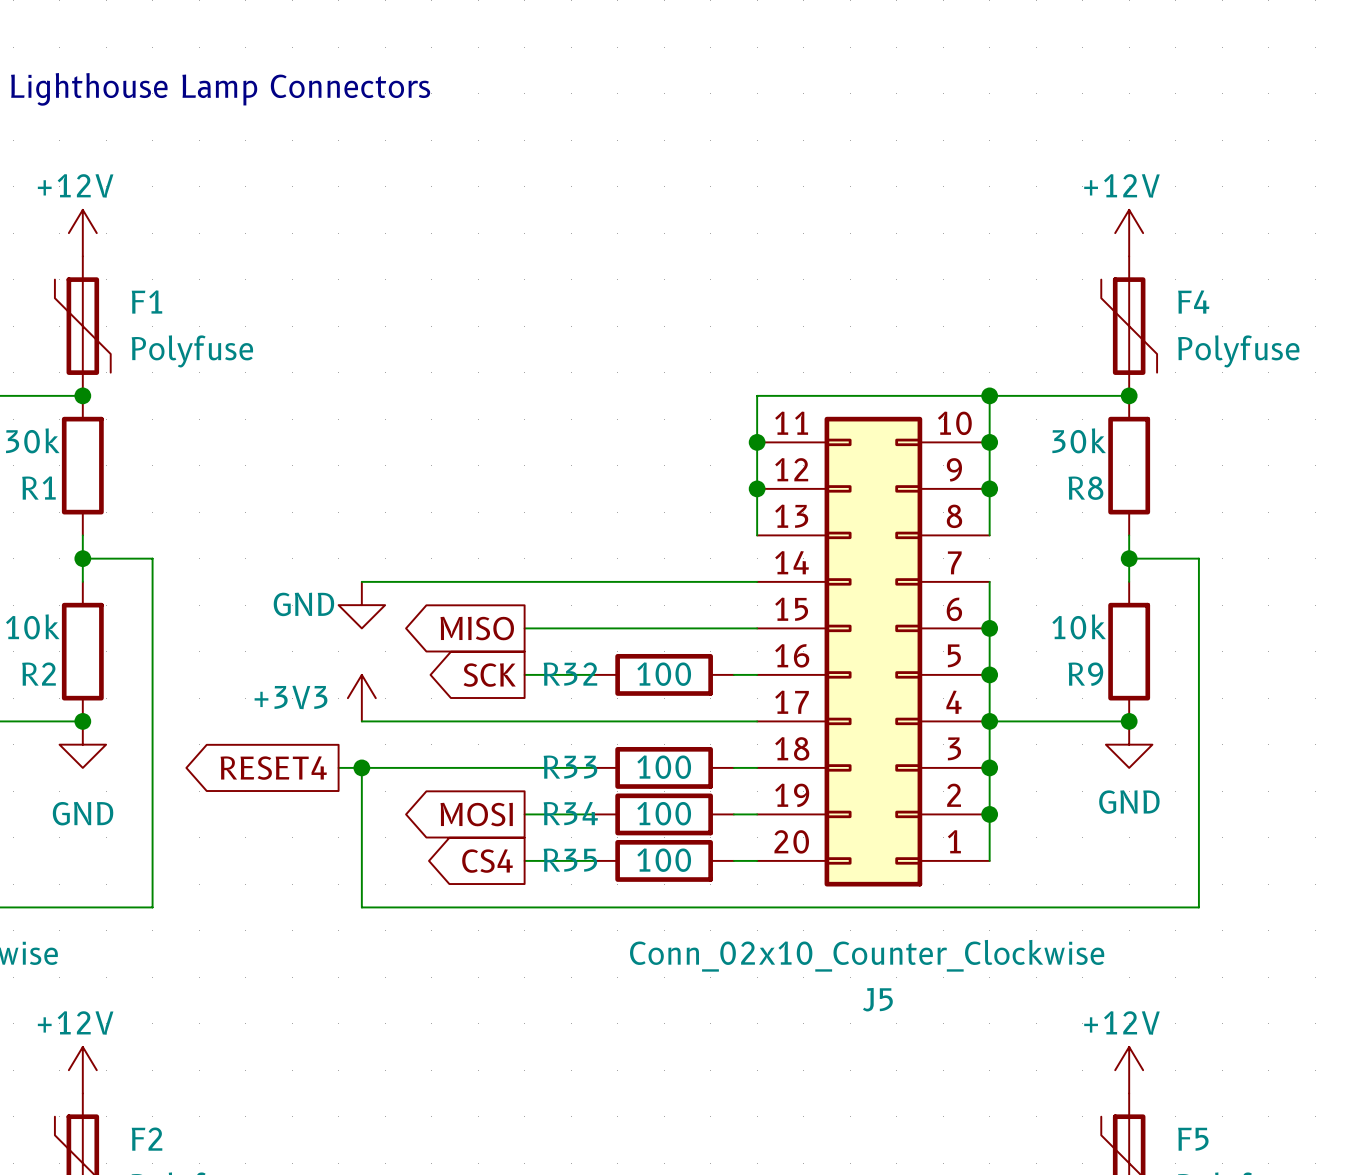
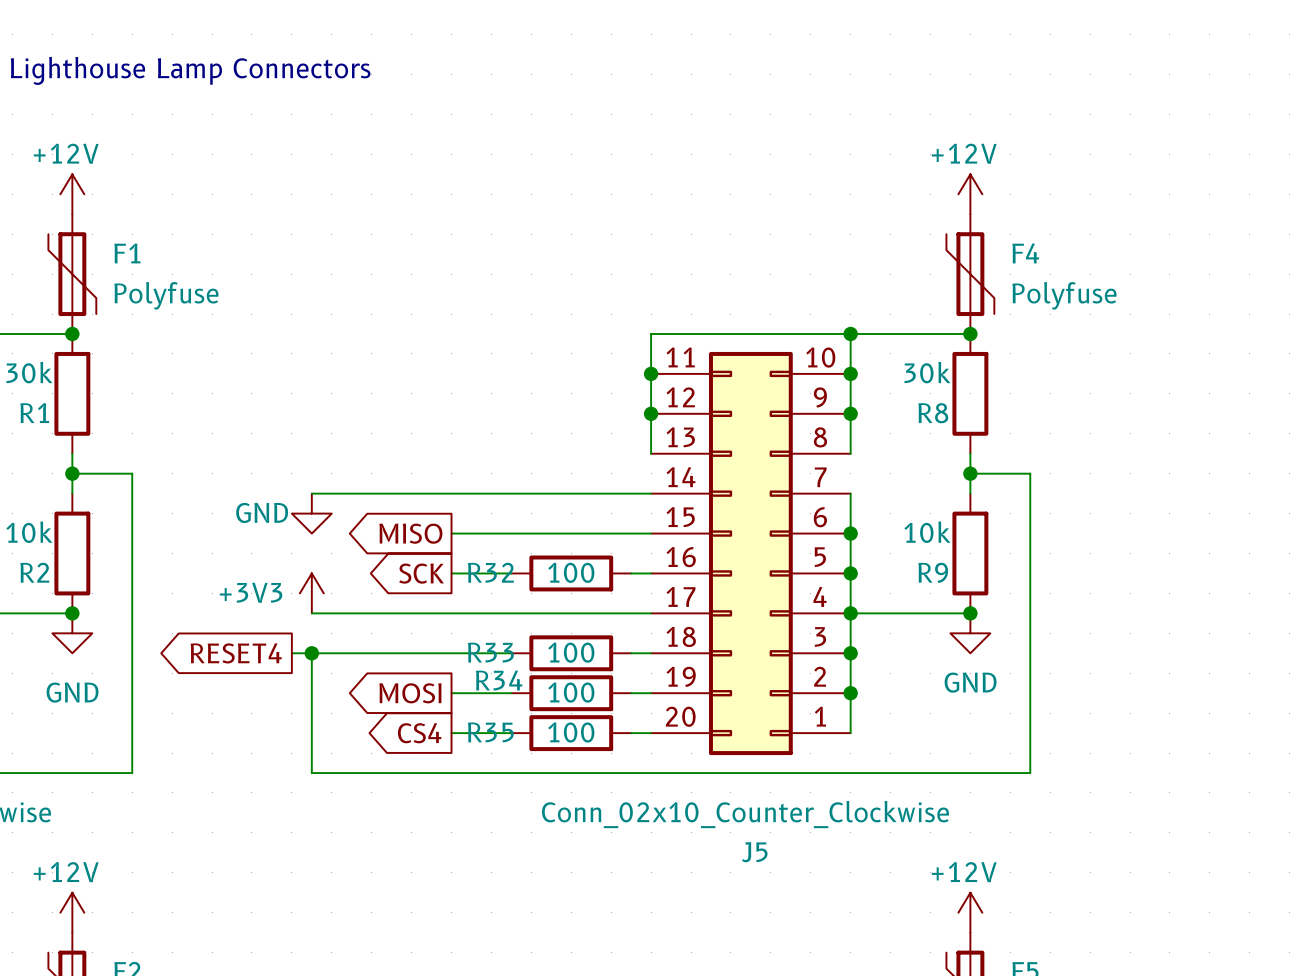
R34 name position: R34 (570, 813) -> R34 (499, 680)

